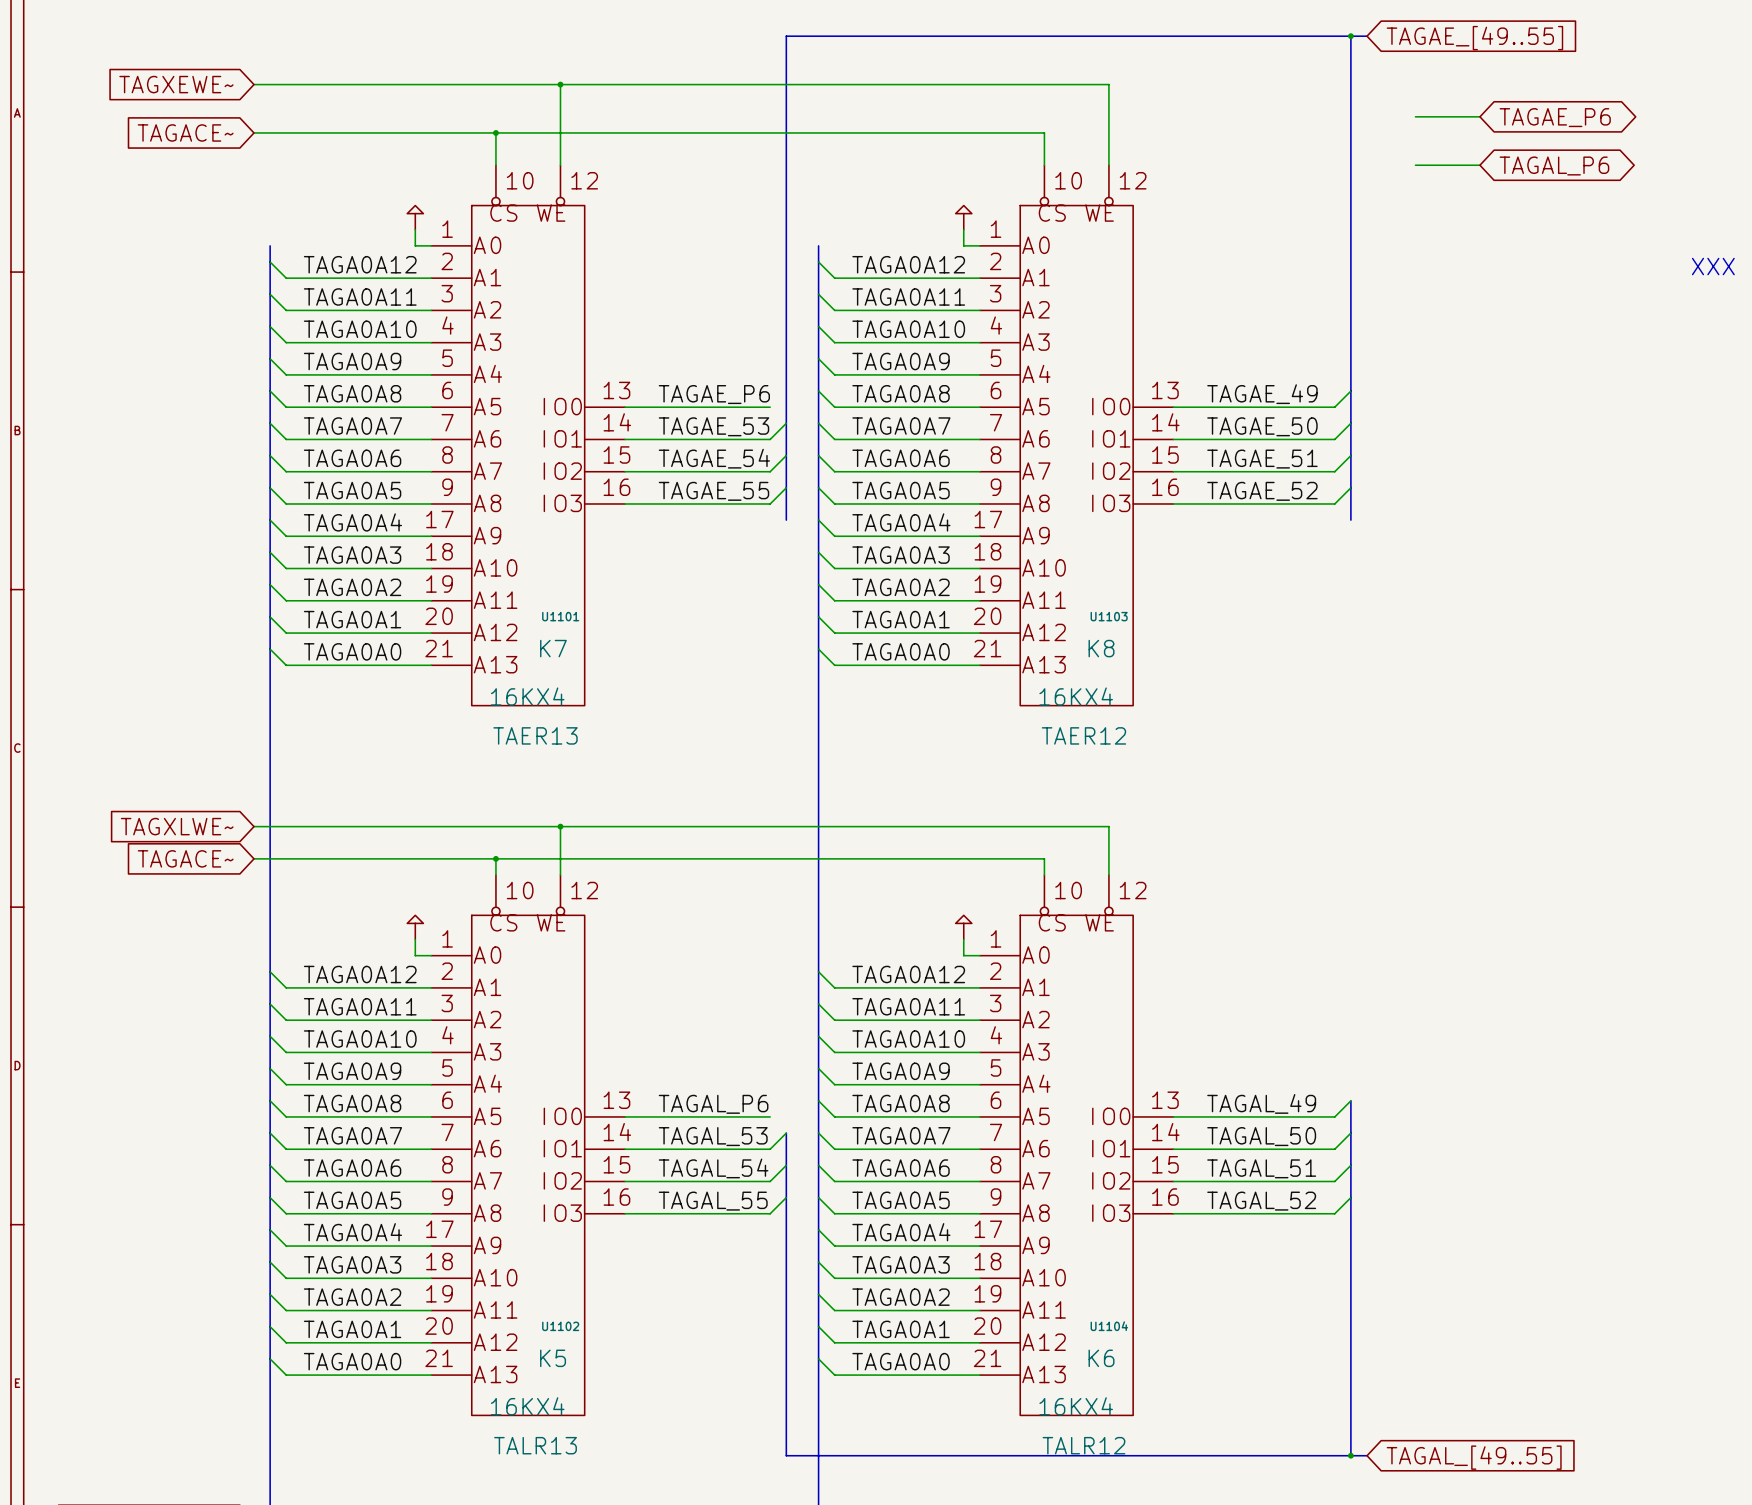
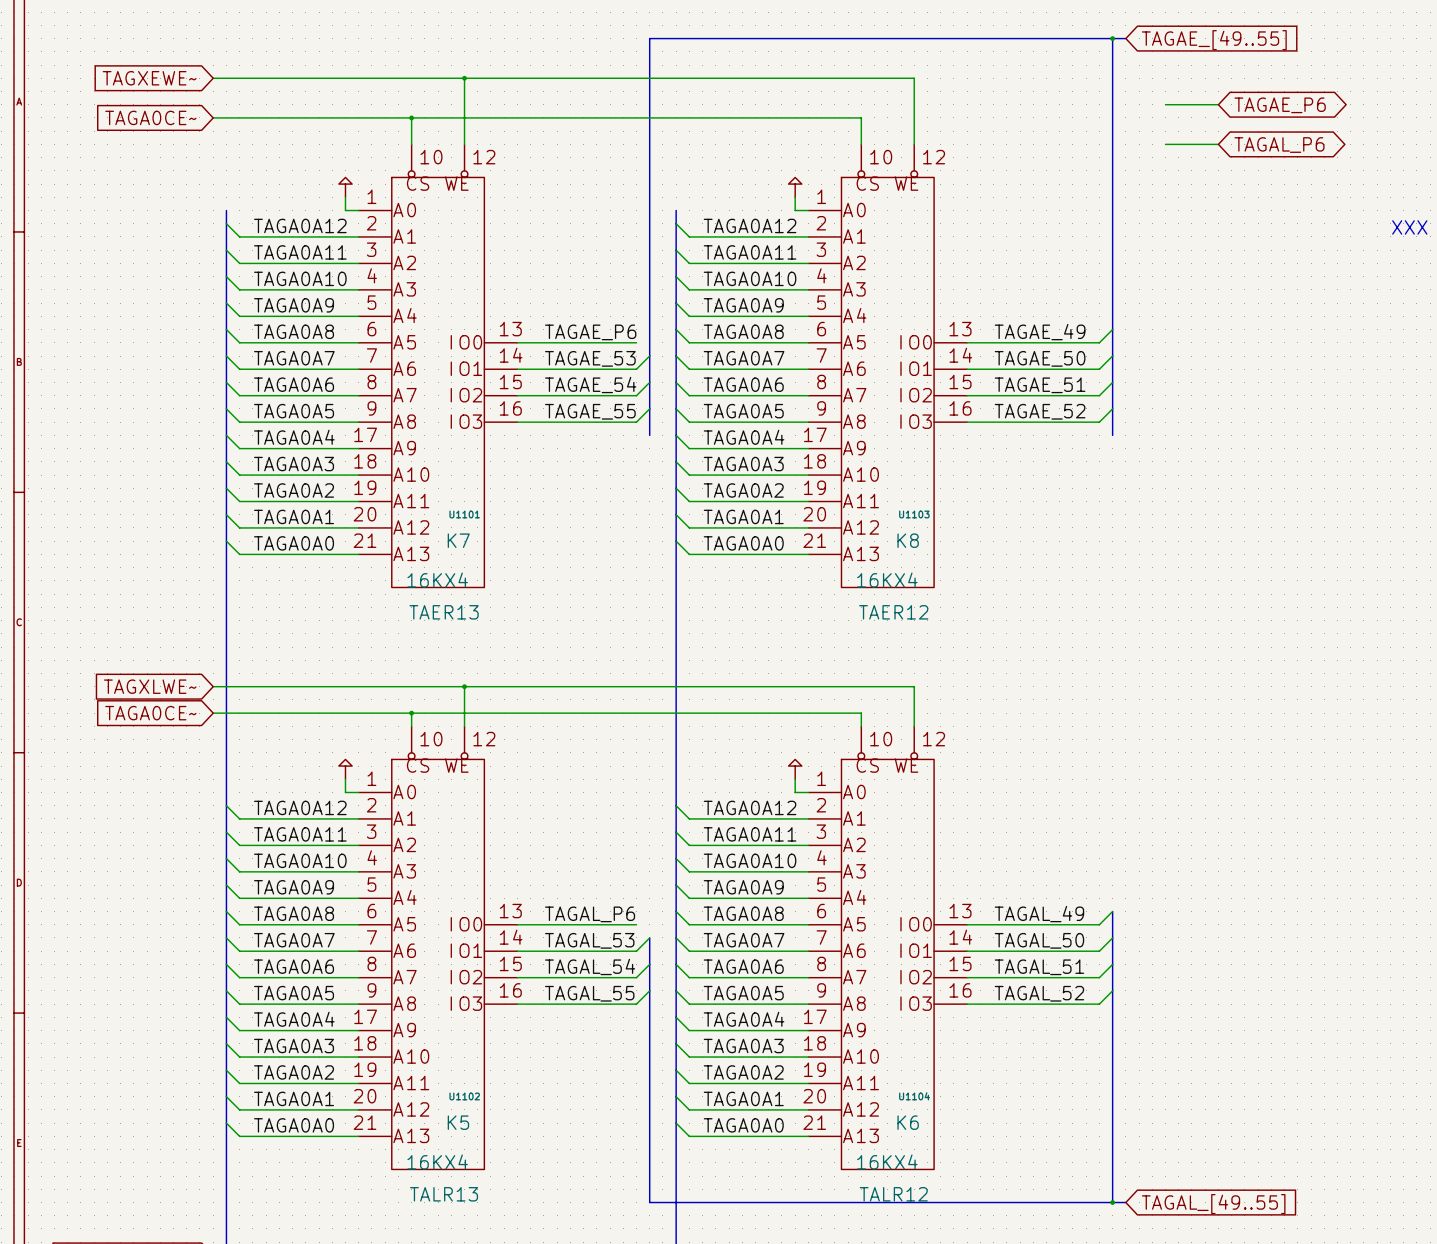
global label: TAGACE~ (185, 132) -> TAGA0CE~ (150, 117)
global label: TAGACE~ (185, 858) -> TAGA0CE~ (150, 713)

